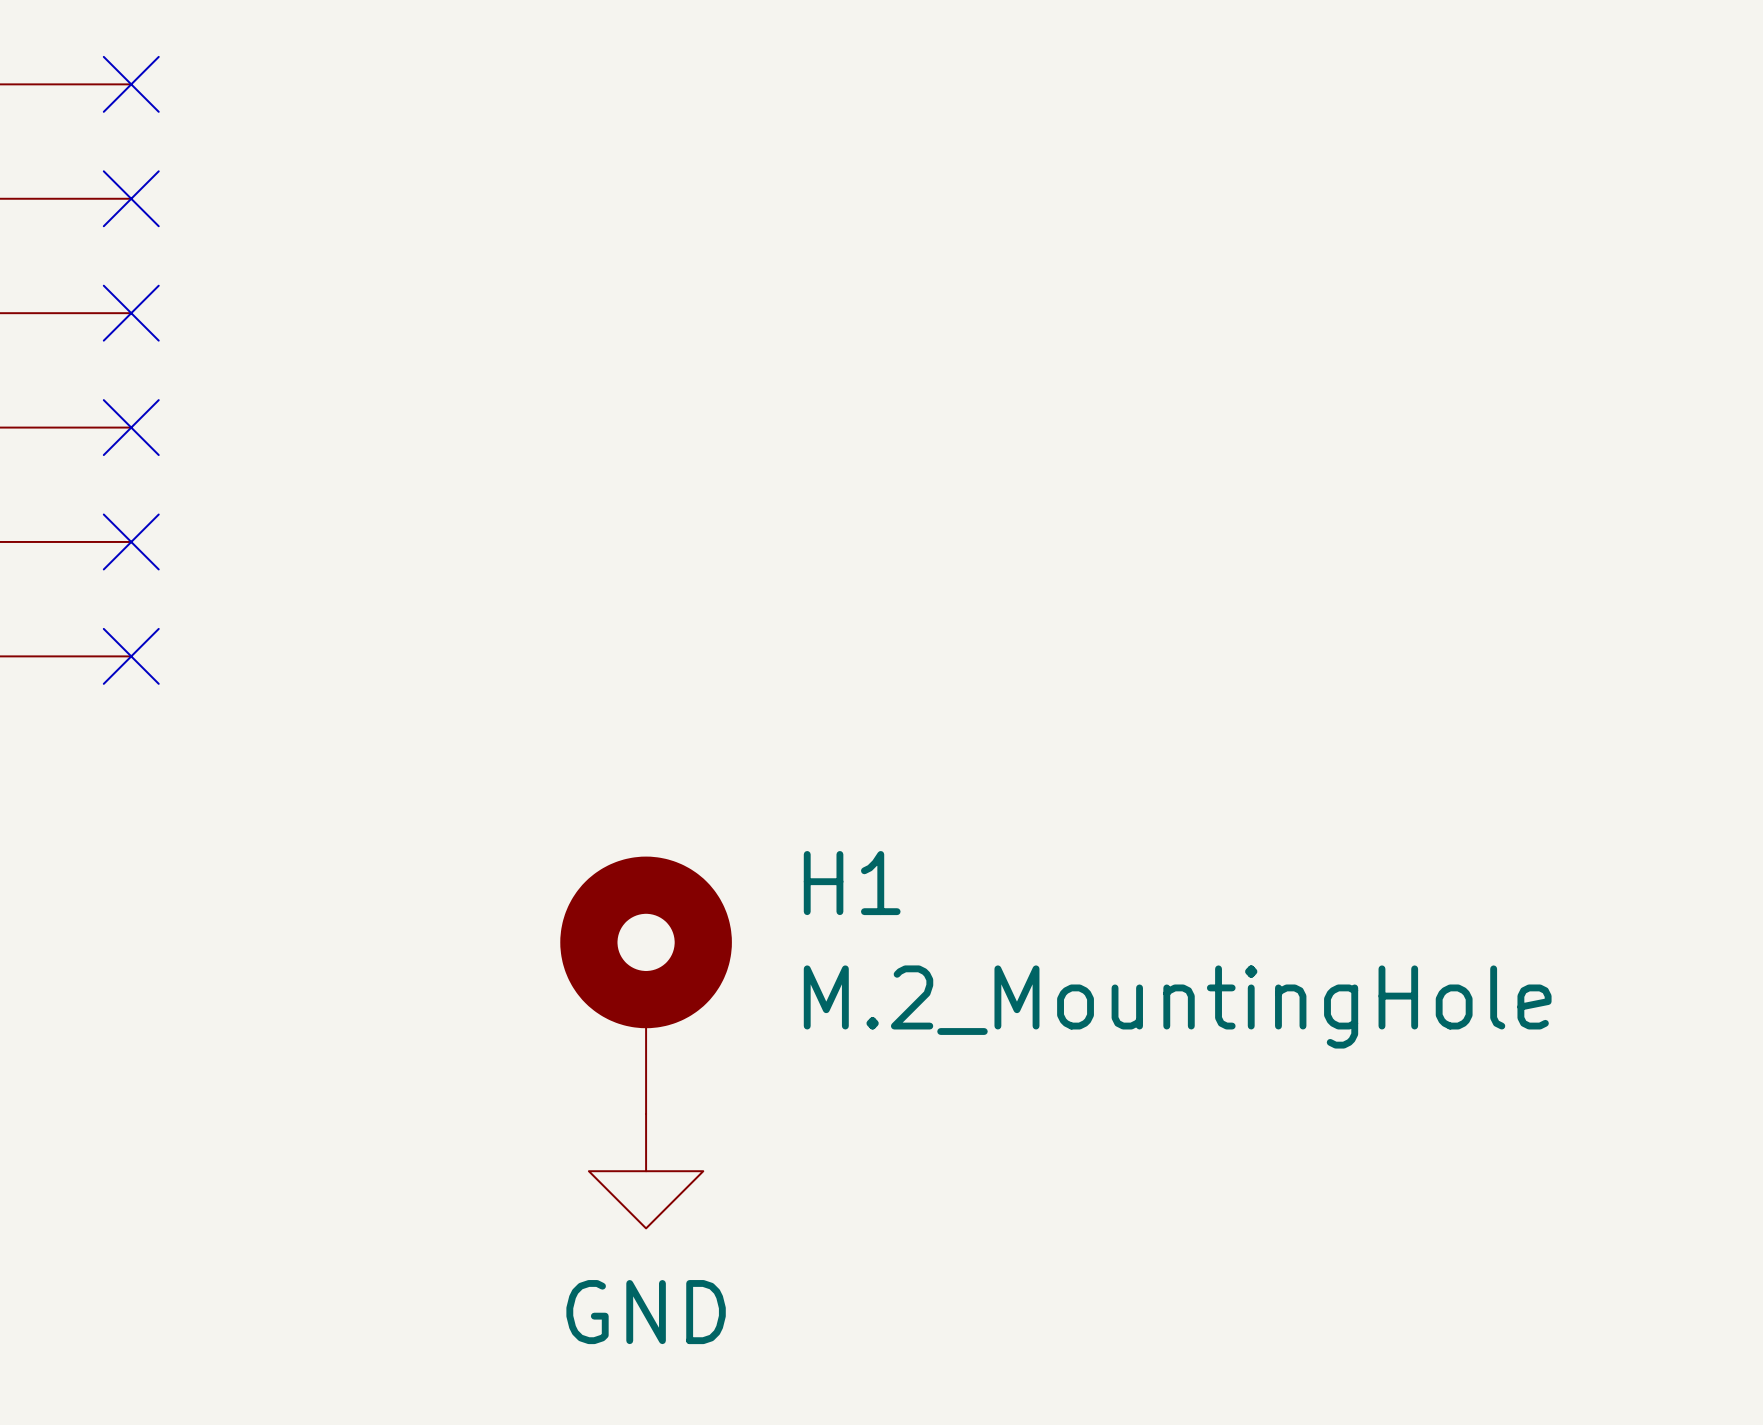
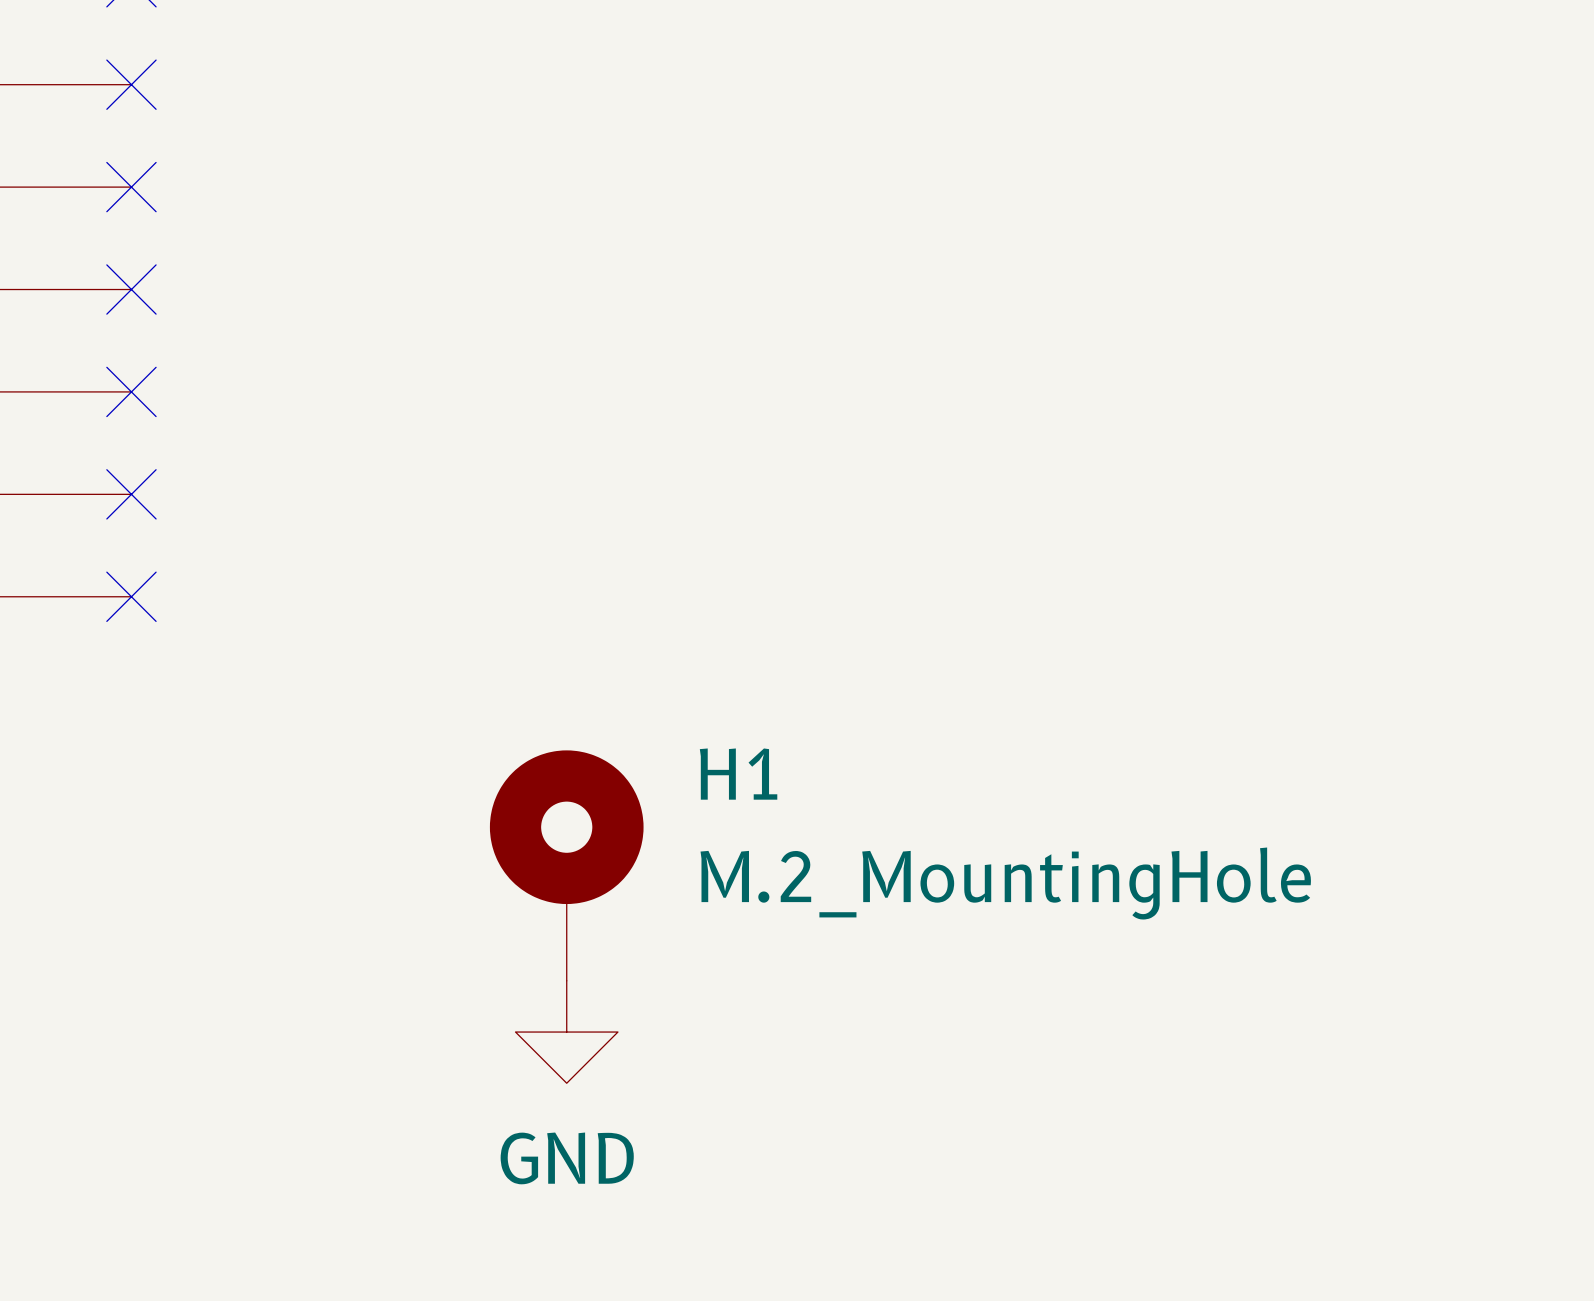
H1 position: (646, 985) -> (566, 865)
power symbol position: GND (646, 1171) -> GND (566, 1032)

